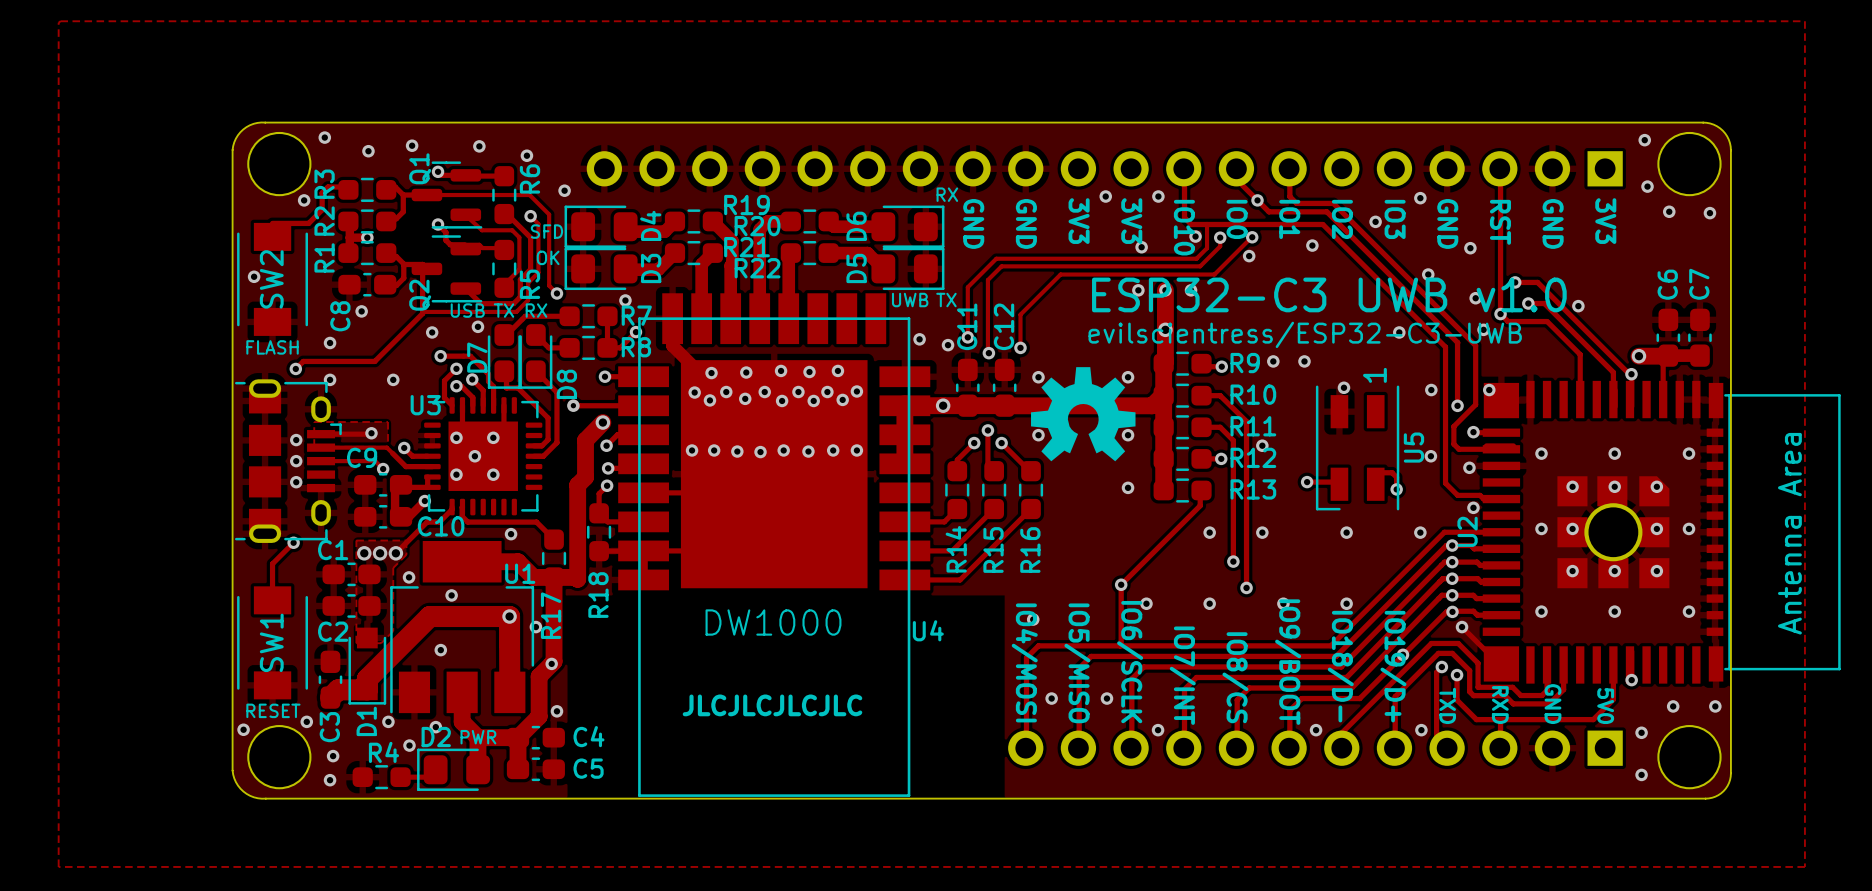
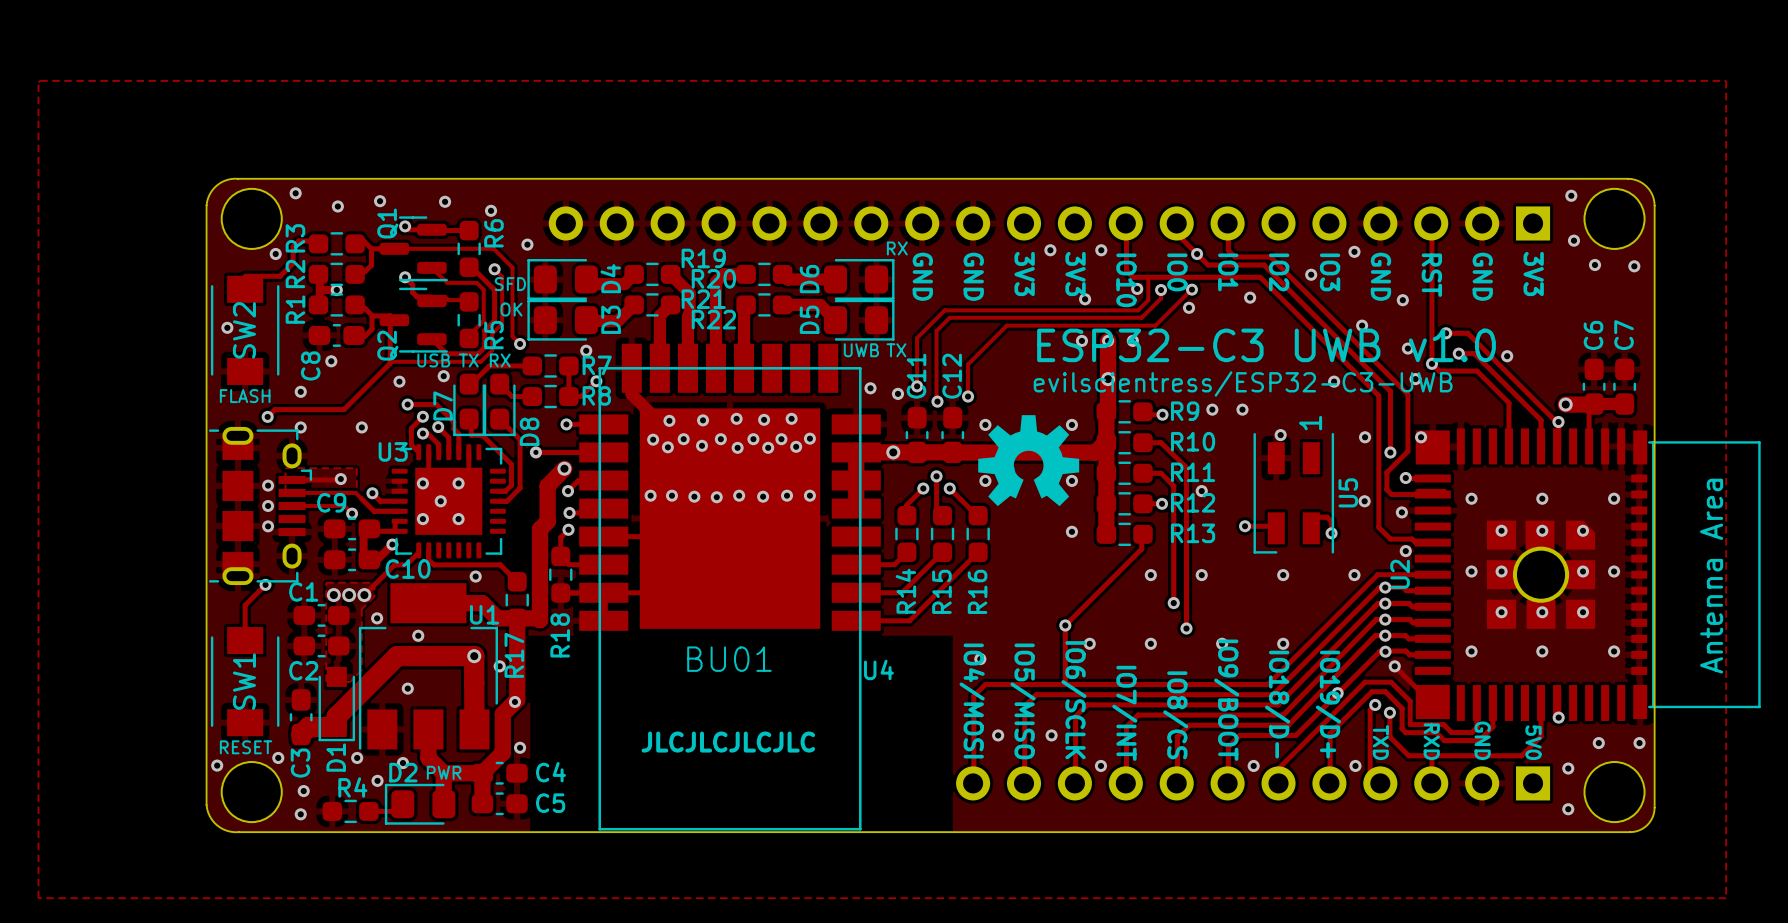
U4 text: none -> BU01 (729, 659)
U4 text: DW1000 (773, 622) -> none

